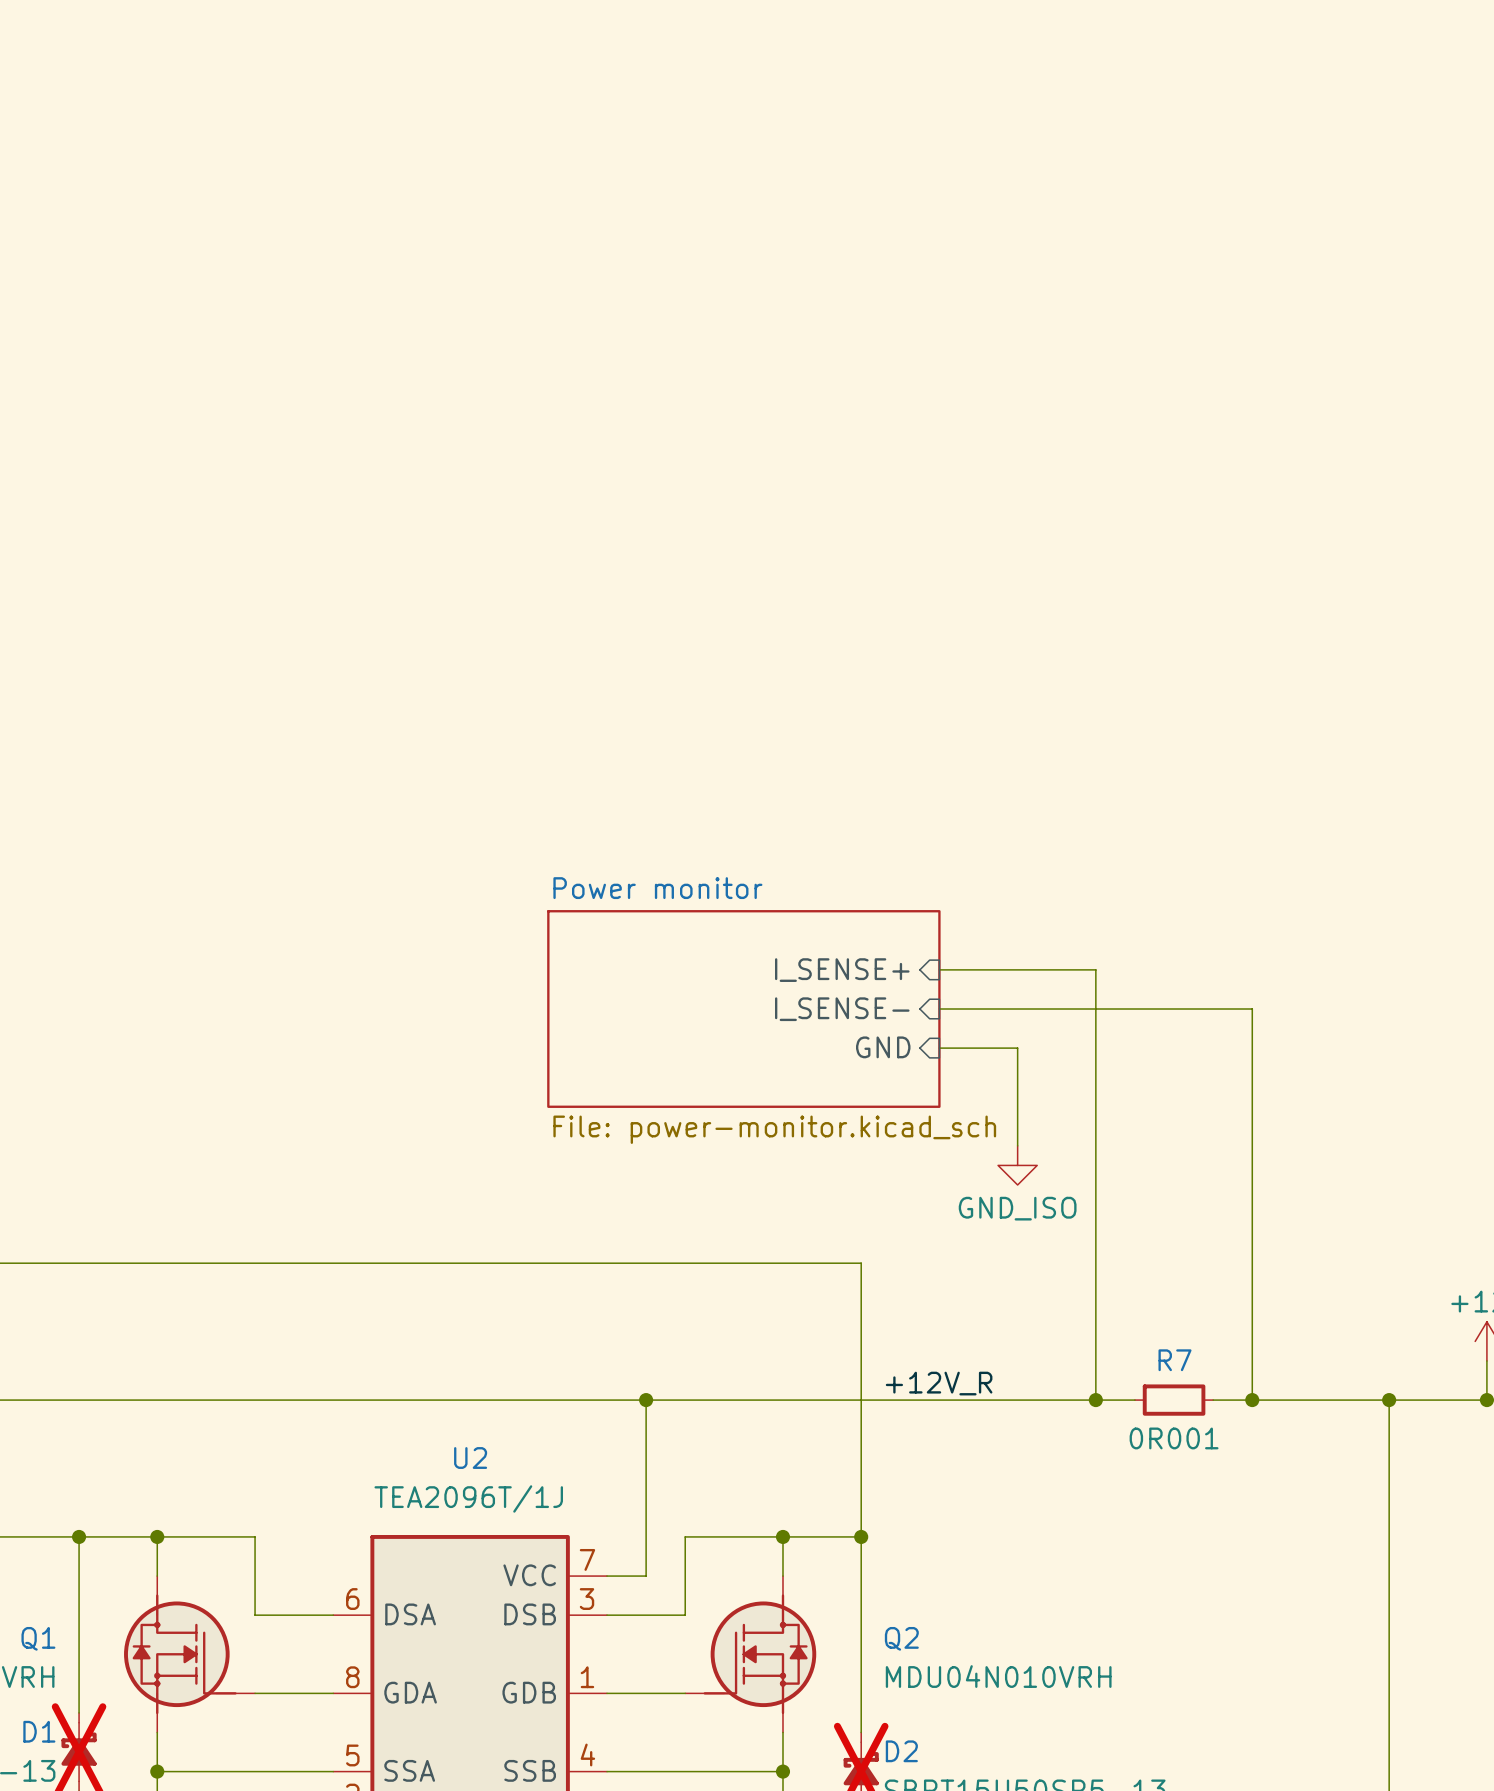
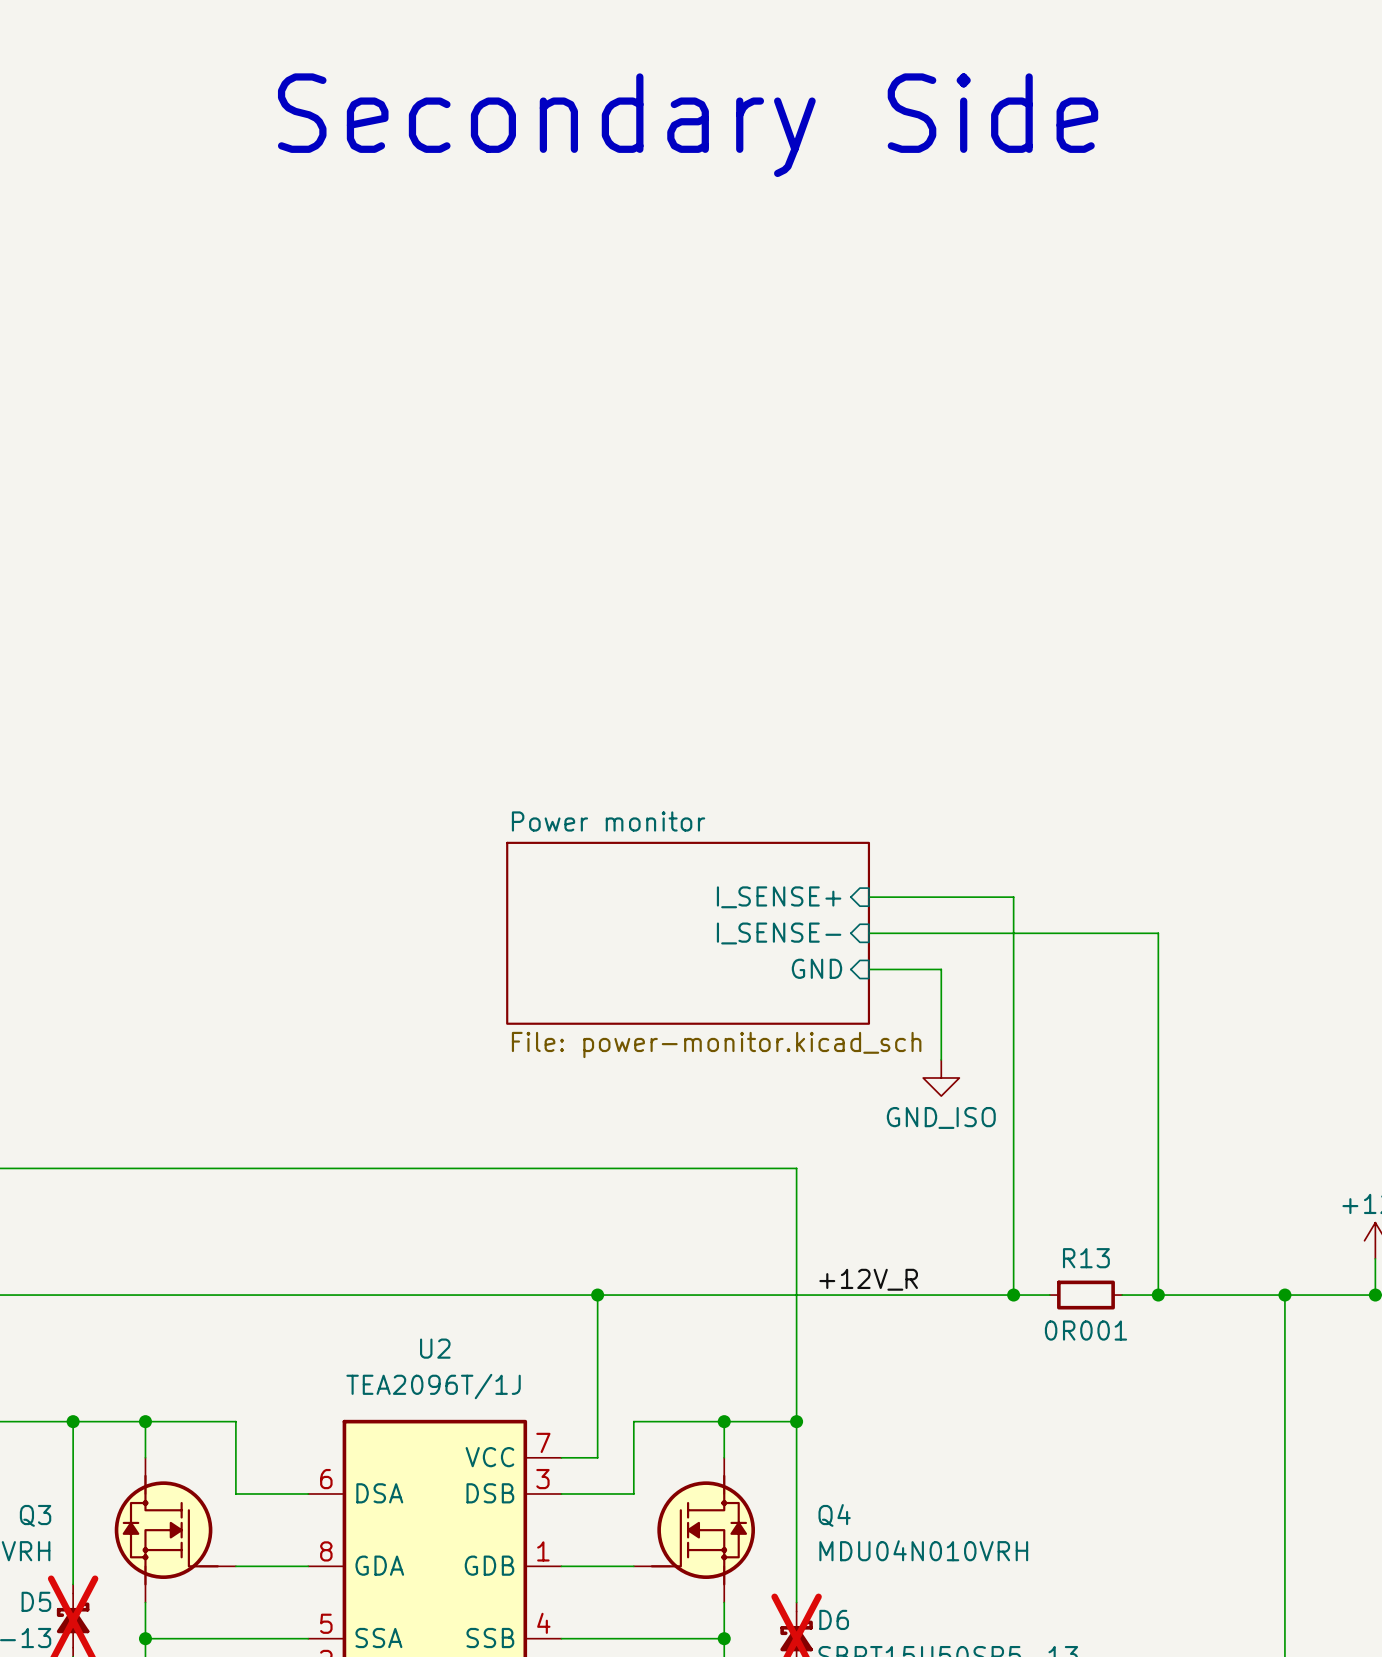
text: none -> Secondary Side (688, 125)
R7 name: R7 (1175, 1360) -> R13 (1086, 1258)
Q1 name: Q1 (38, 1638) -> Q3 (35, 1515)
Q2 name: Q2 (901, 1638) -> Q4 (834, 1515)
D1 name: D1 (39, 1731) -> D5 (36, 1601)
D2 name: D2 (901, 1751) -> D6 (834, 1619)

